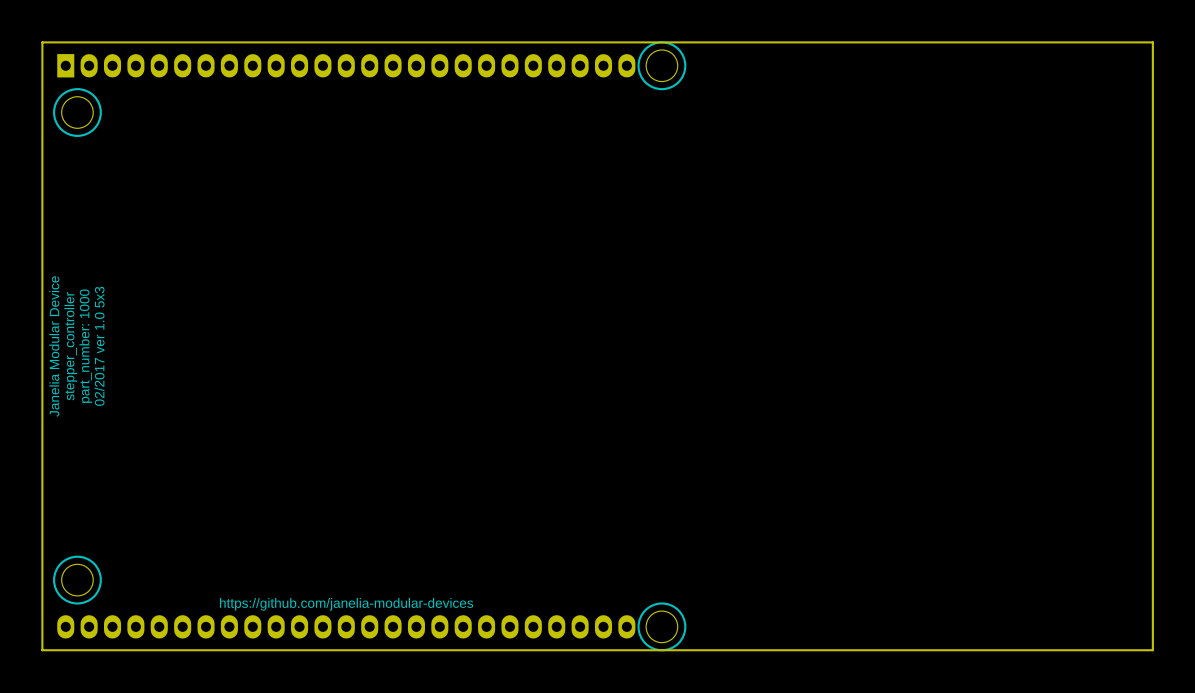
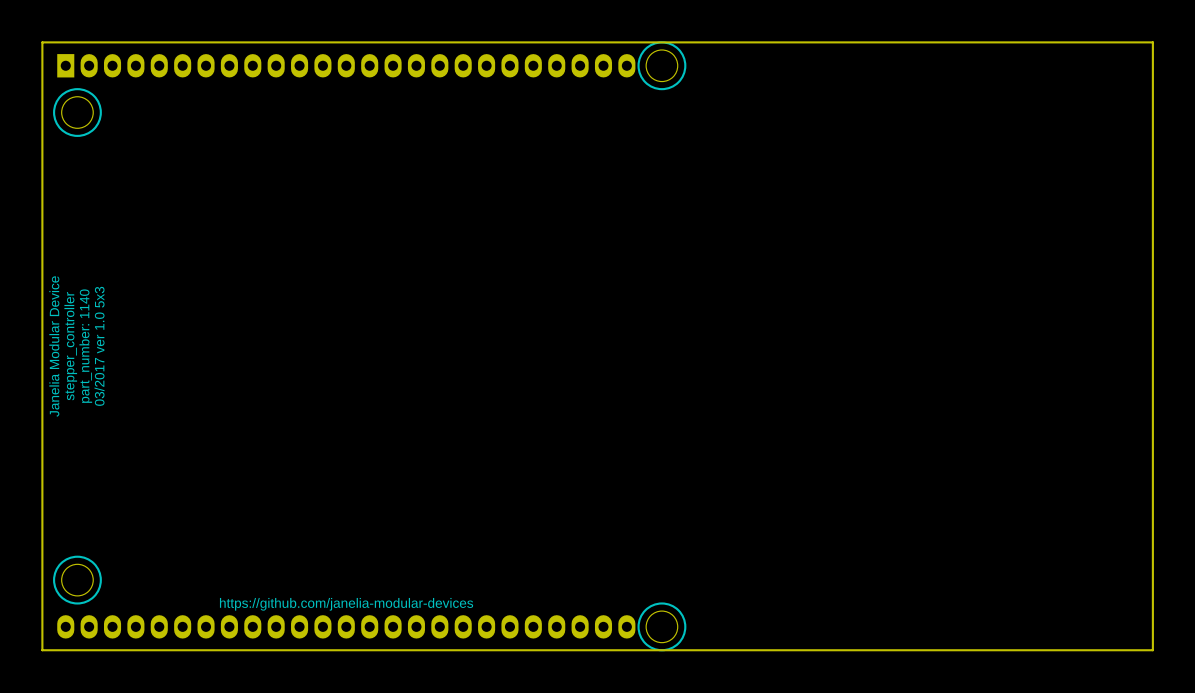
text: part_number: 1000 (85, 346) -> part_number: 1140 (85, 346)
text: 02/2017 ver 1.0 5x3 (99, 346) -> 03/2017 ver 1.0 5x3 (99, 346)

